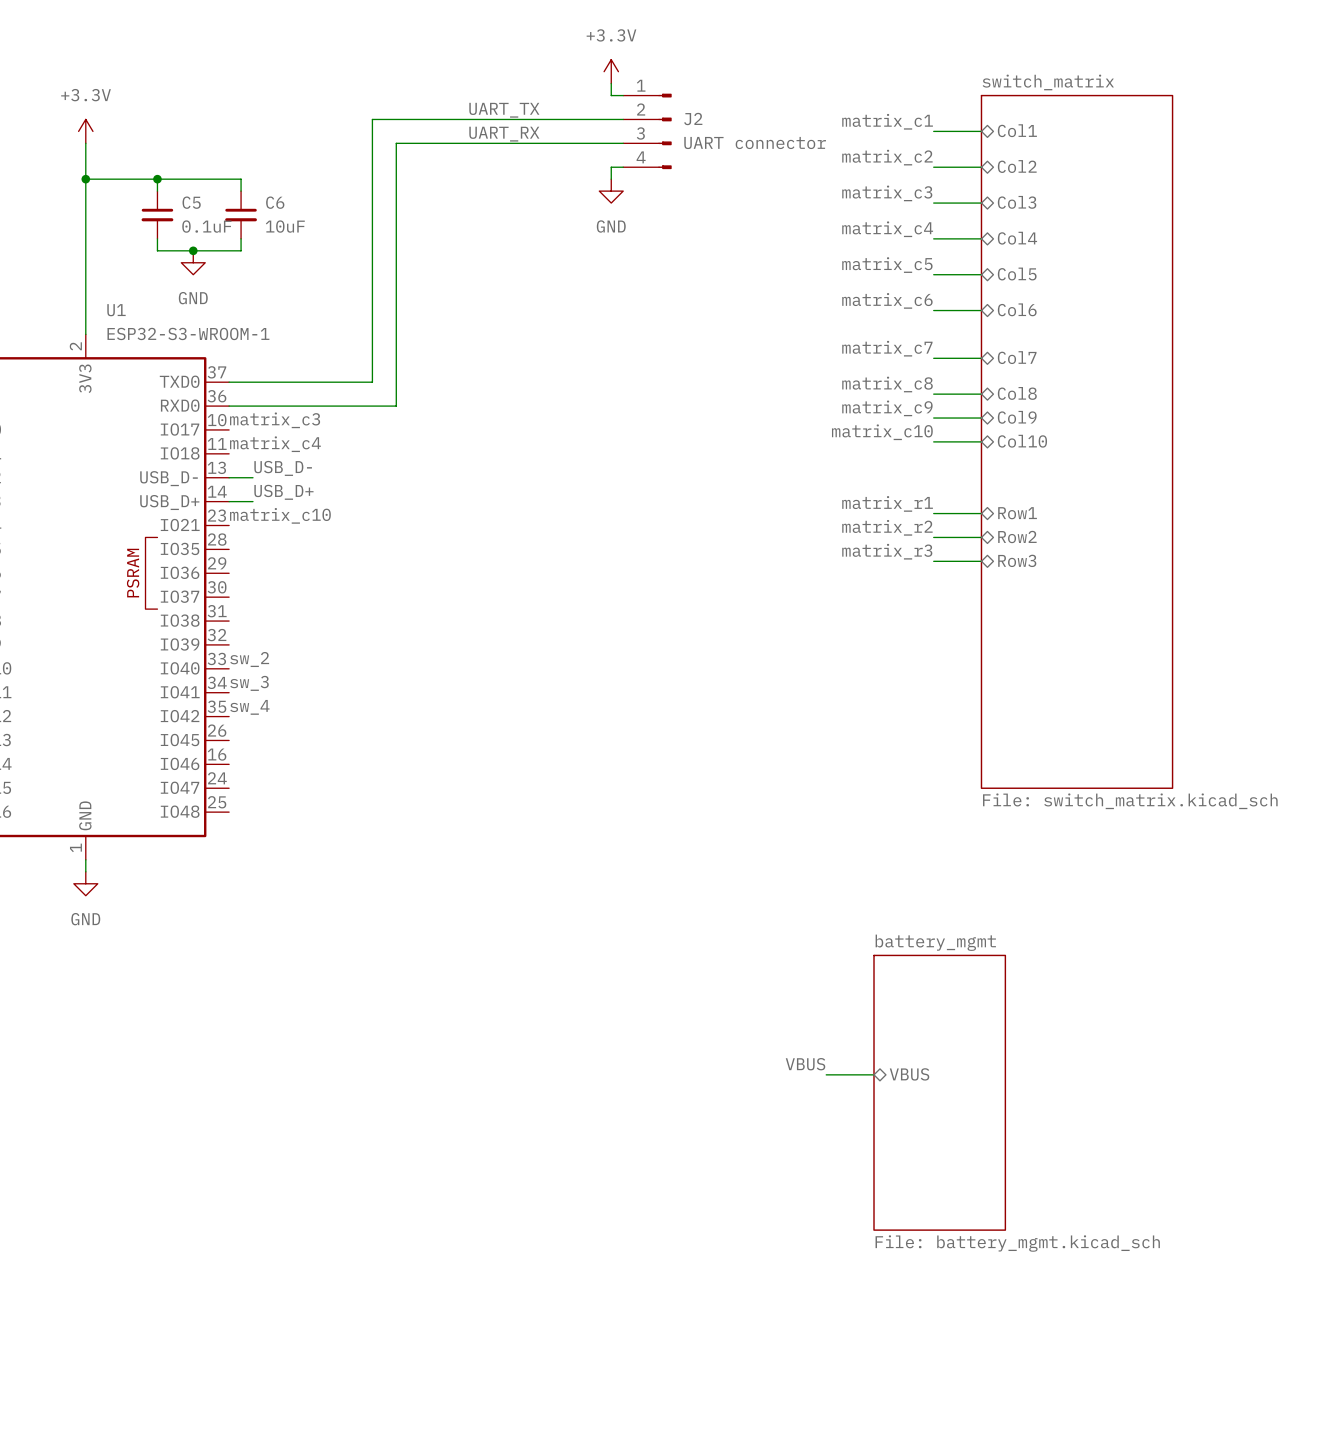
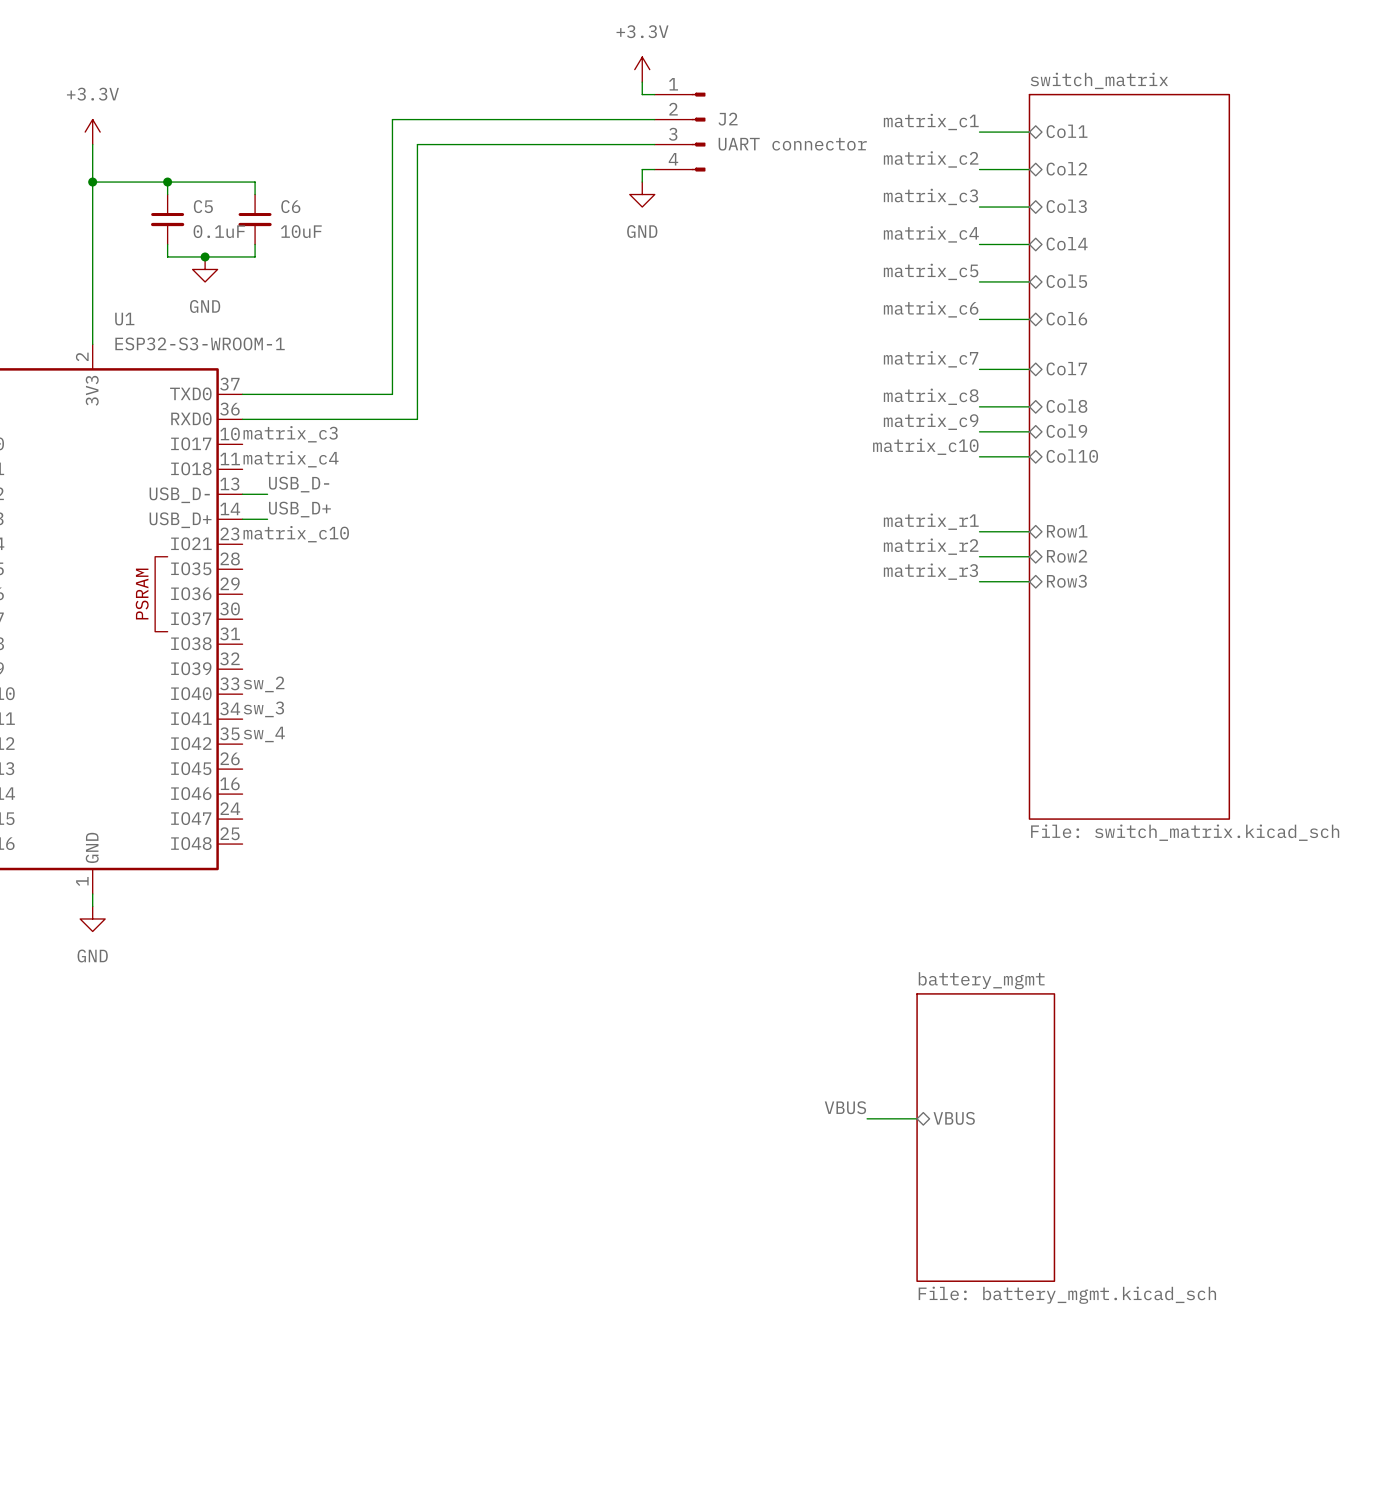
label: UART_TX (504, 110) -> none
label: UART_RX (504, 134) -> none

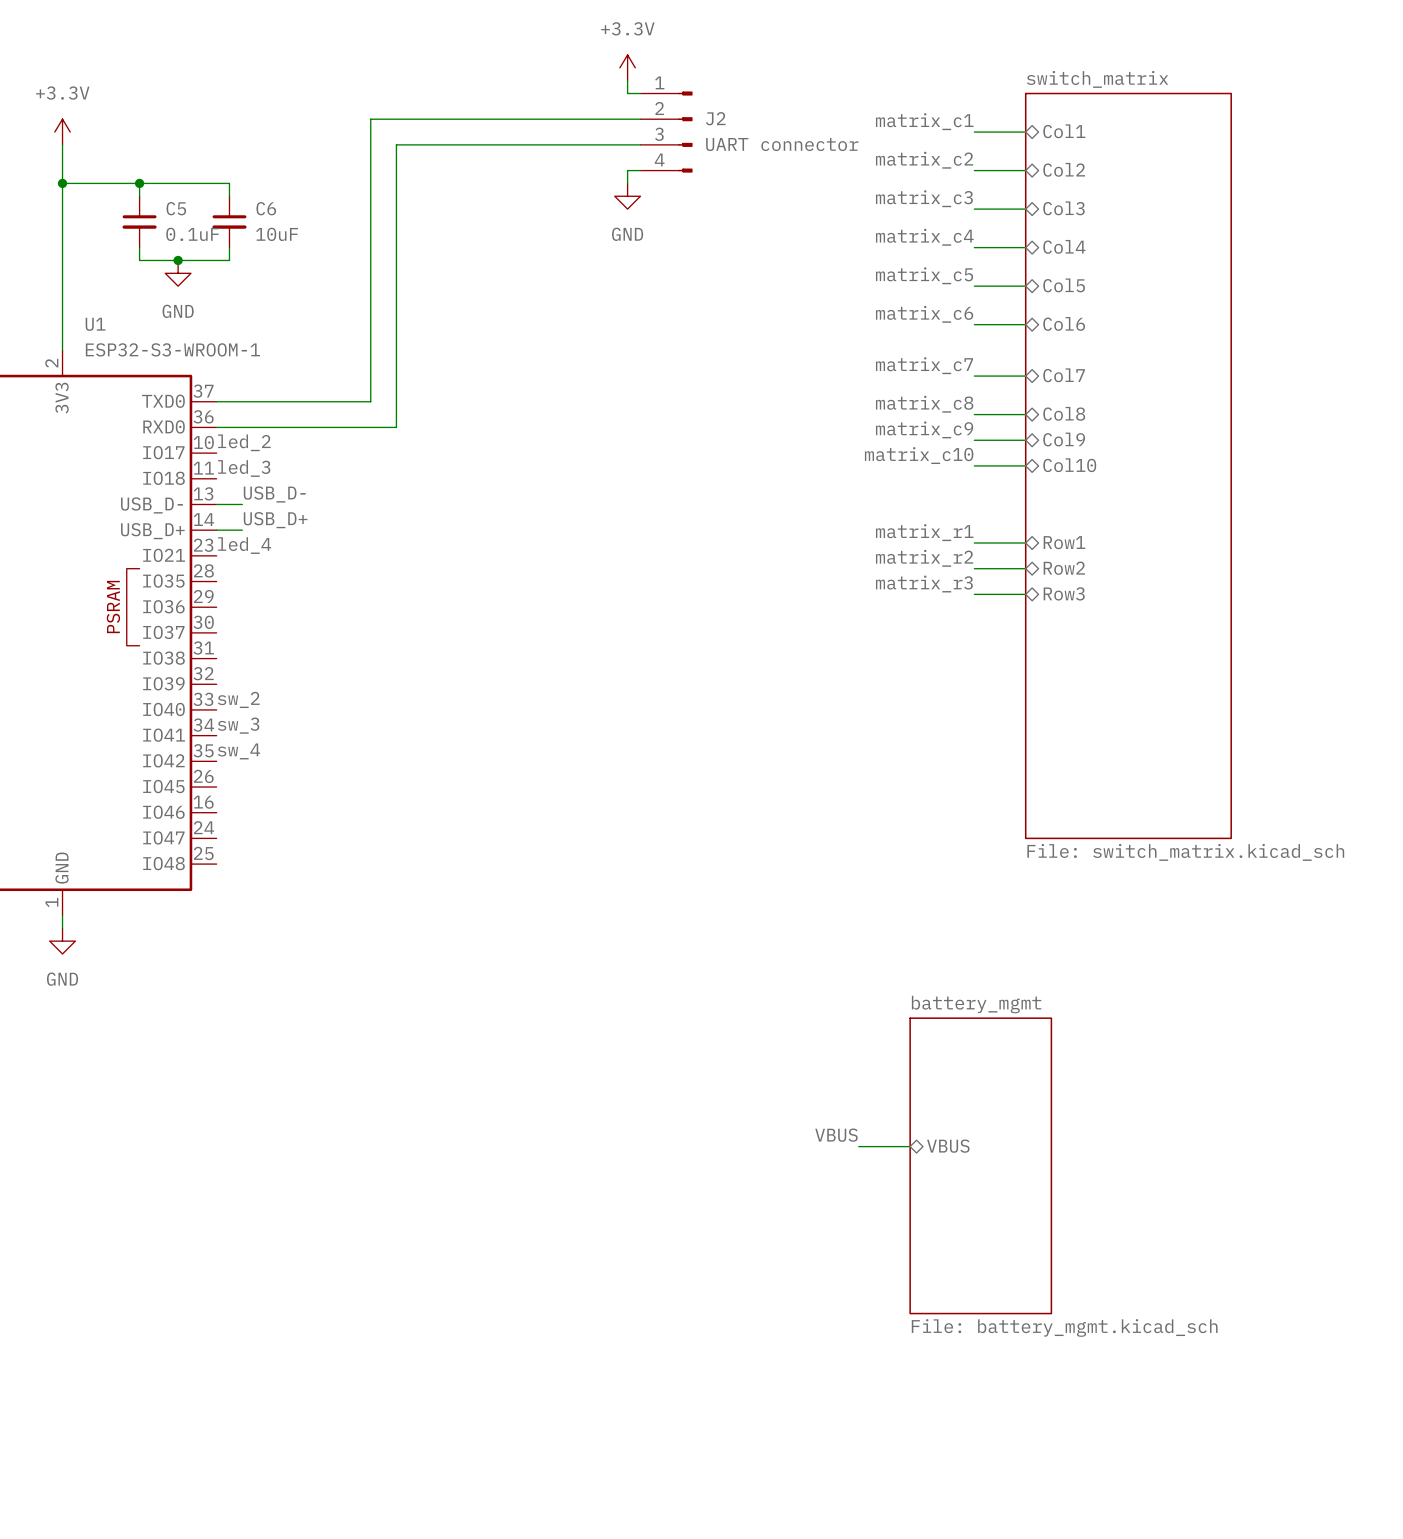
label: matrix_c3 (290, 434) -> led_2 (244, 442)
label: matrix_c4 (291, 459) -> led_3 (244, 468)
label: matrix_c10 (296, 534) -> led_4 (244, 545)

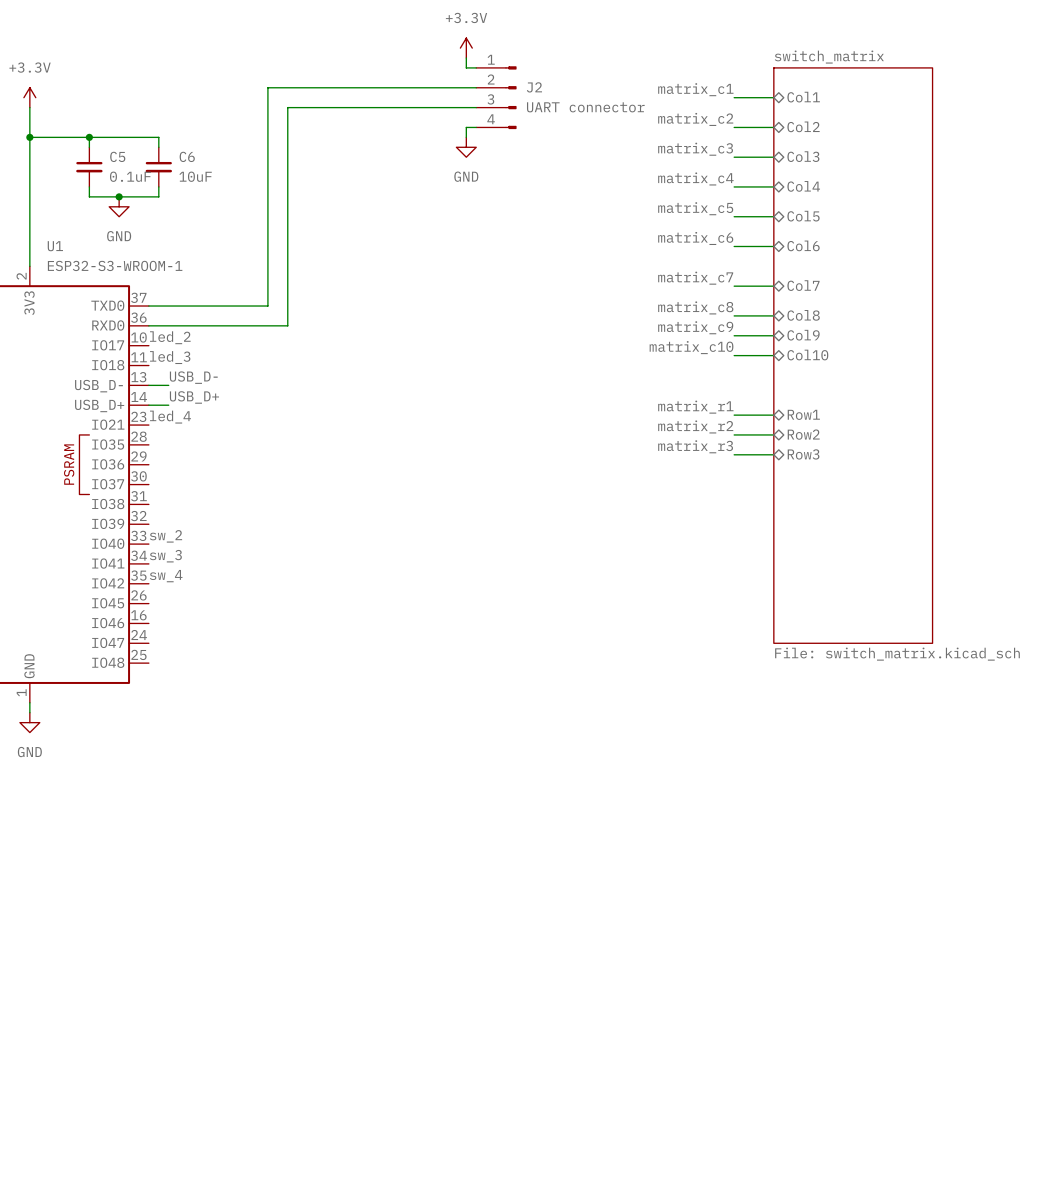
label: VBUS (836, 1135) -> none
wire: (858, 1146) (910, 1146) -> none
sheet pin: VBUS (948, 1146) -> none
sheet battery_mgmt: File: battery_mgmt.kicad_sch (980, 1165) -> none

